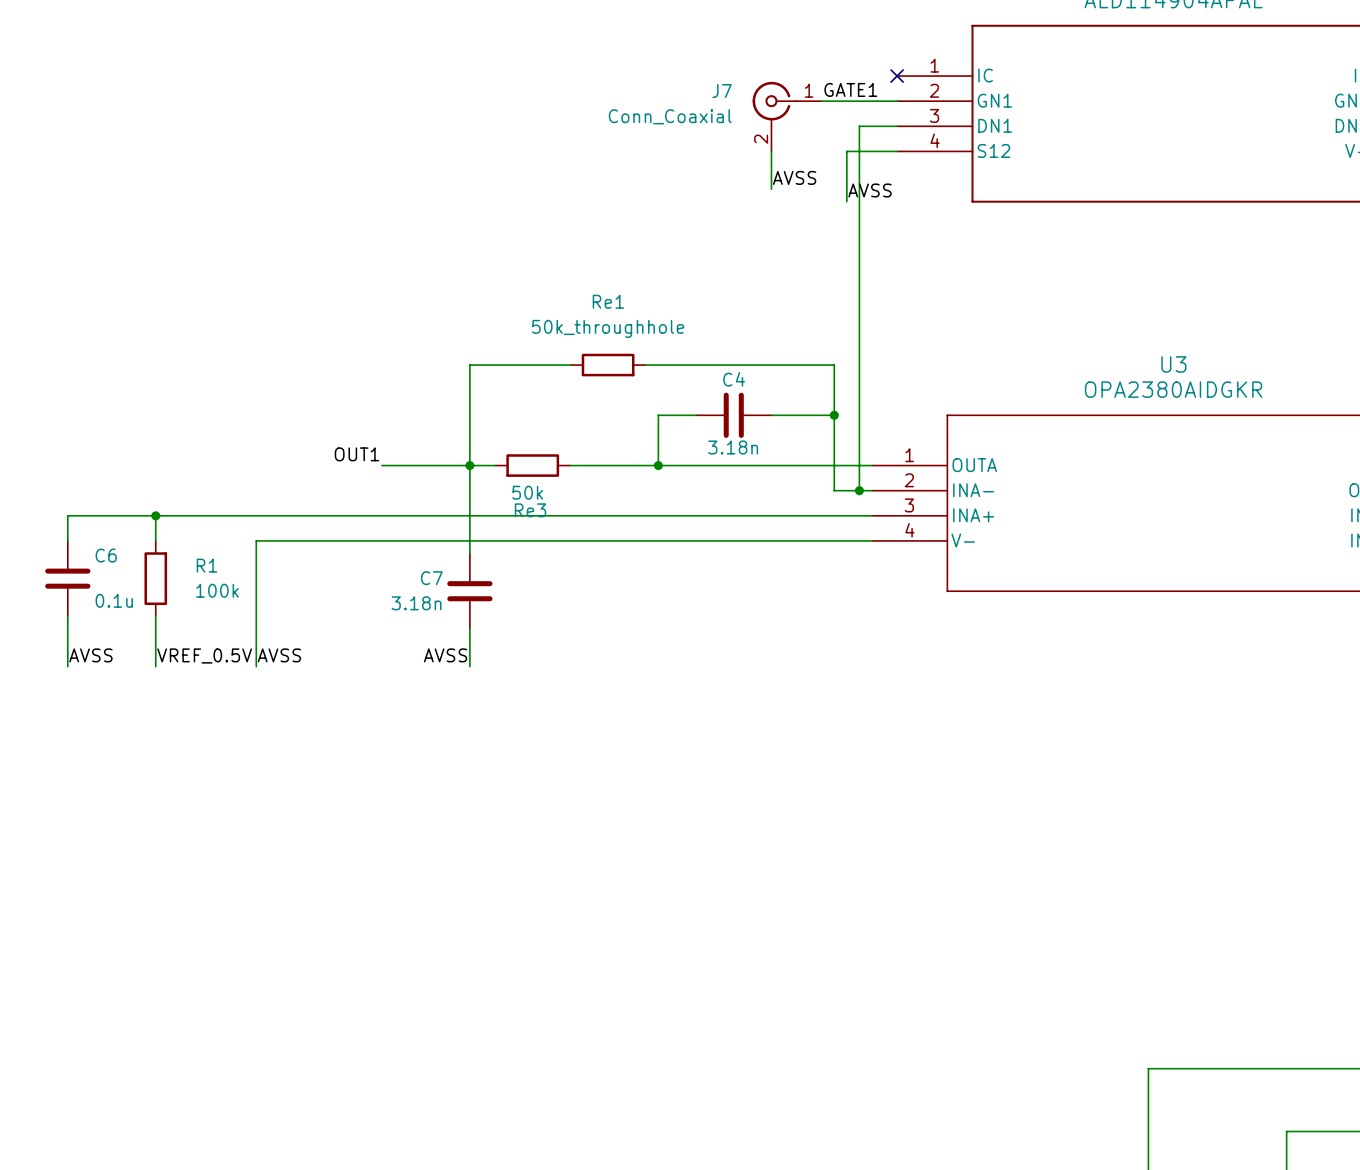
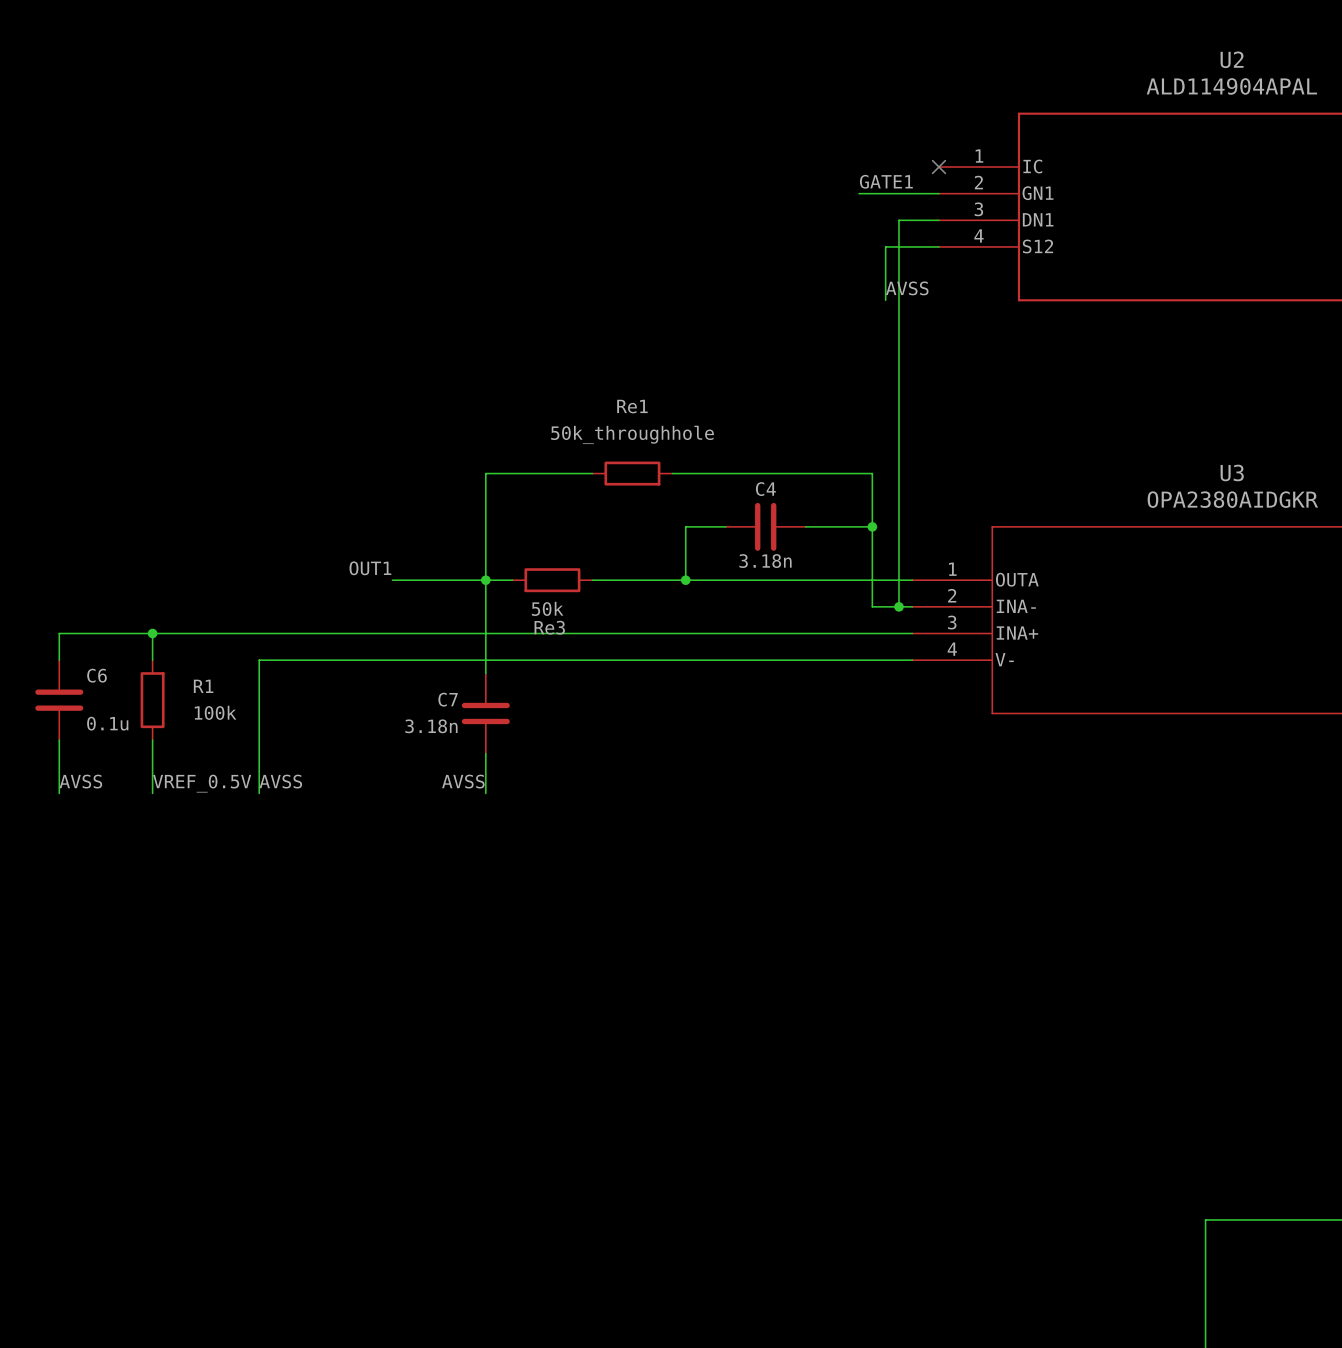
J7: Conn_Coaxial (787, 116) -> none
wire: (771, 151) (771, 189) -> none
label: AVSS (794, 177) -> none

